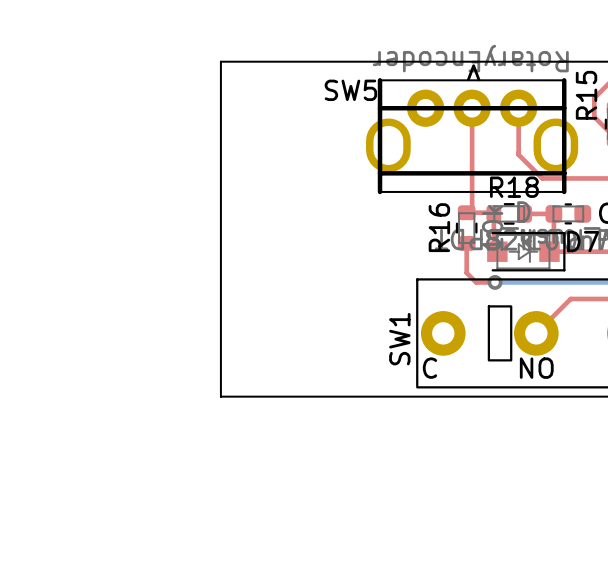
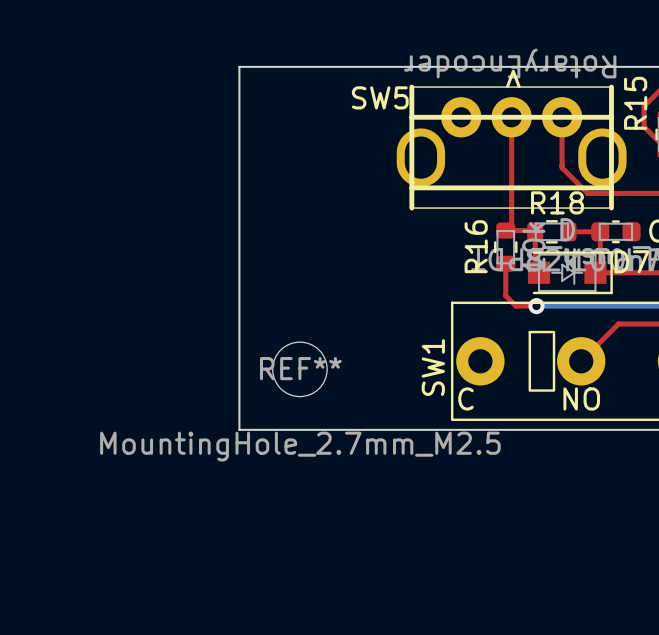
REF**: none -> MountingHole_2.7mm_M2.5 (299, 369)

